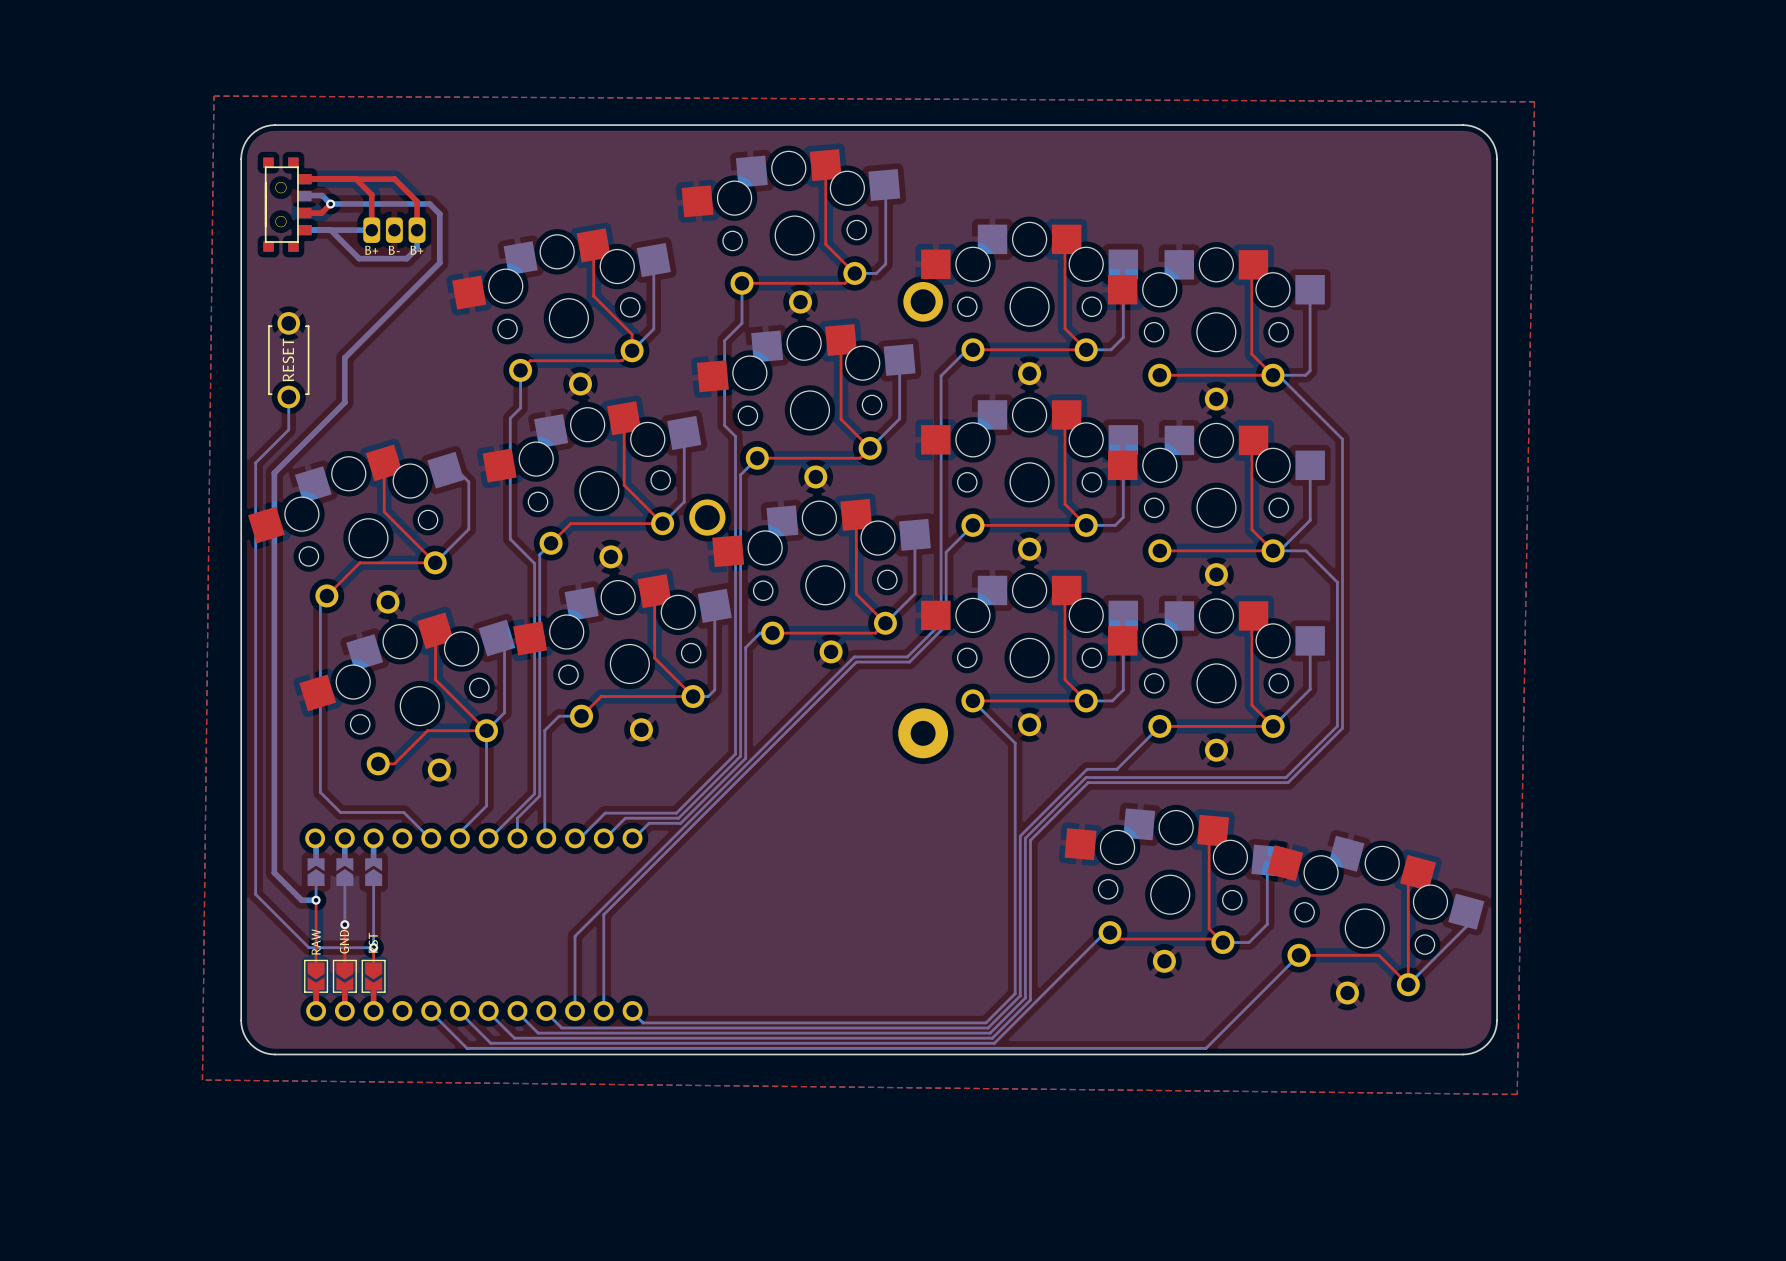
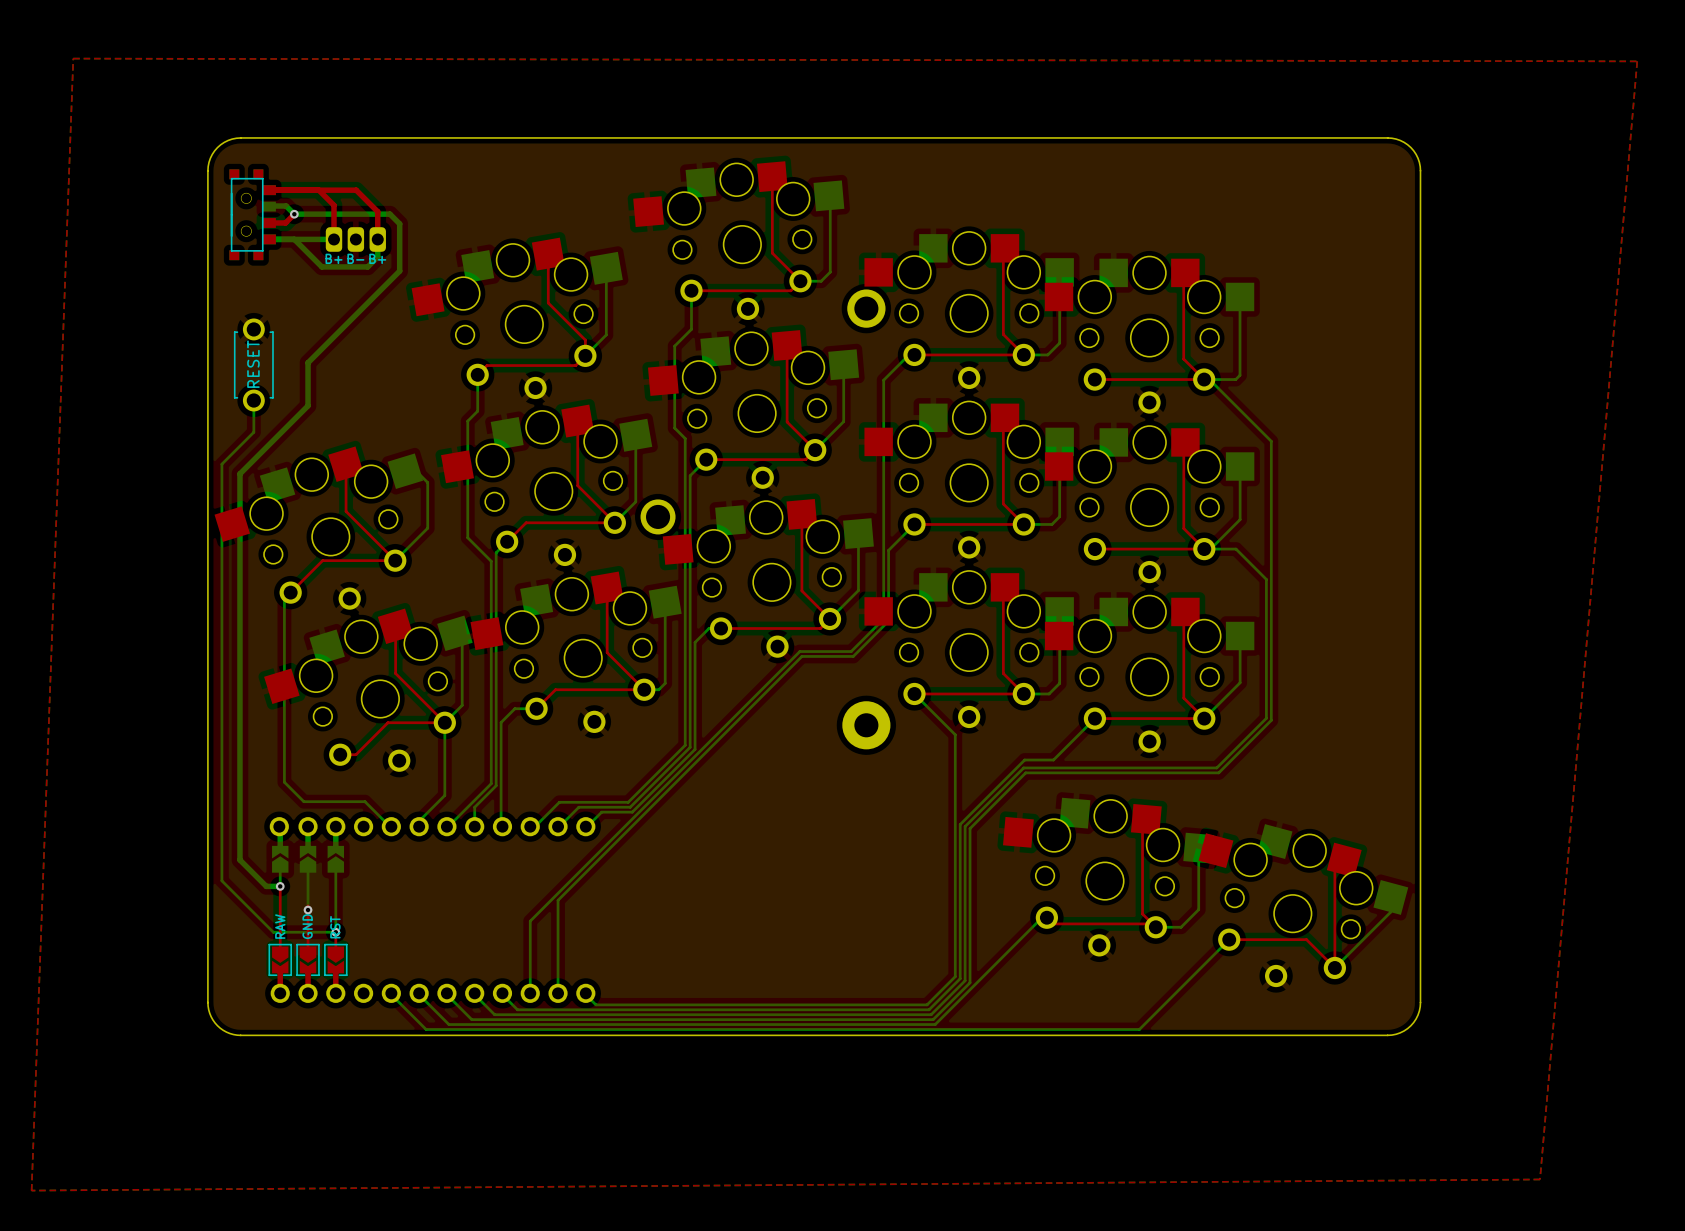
top zone outline: (213, 96) (202, 1080) (1517, 1094) (1534, 101) (213, 96) -> (73, 58) (31, 1190) (1540, 1179) (1637, 61) (73, 58)

